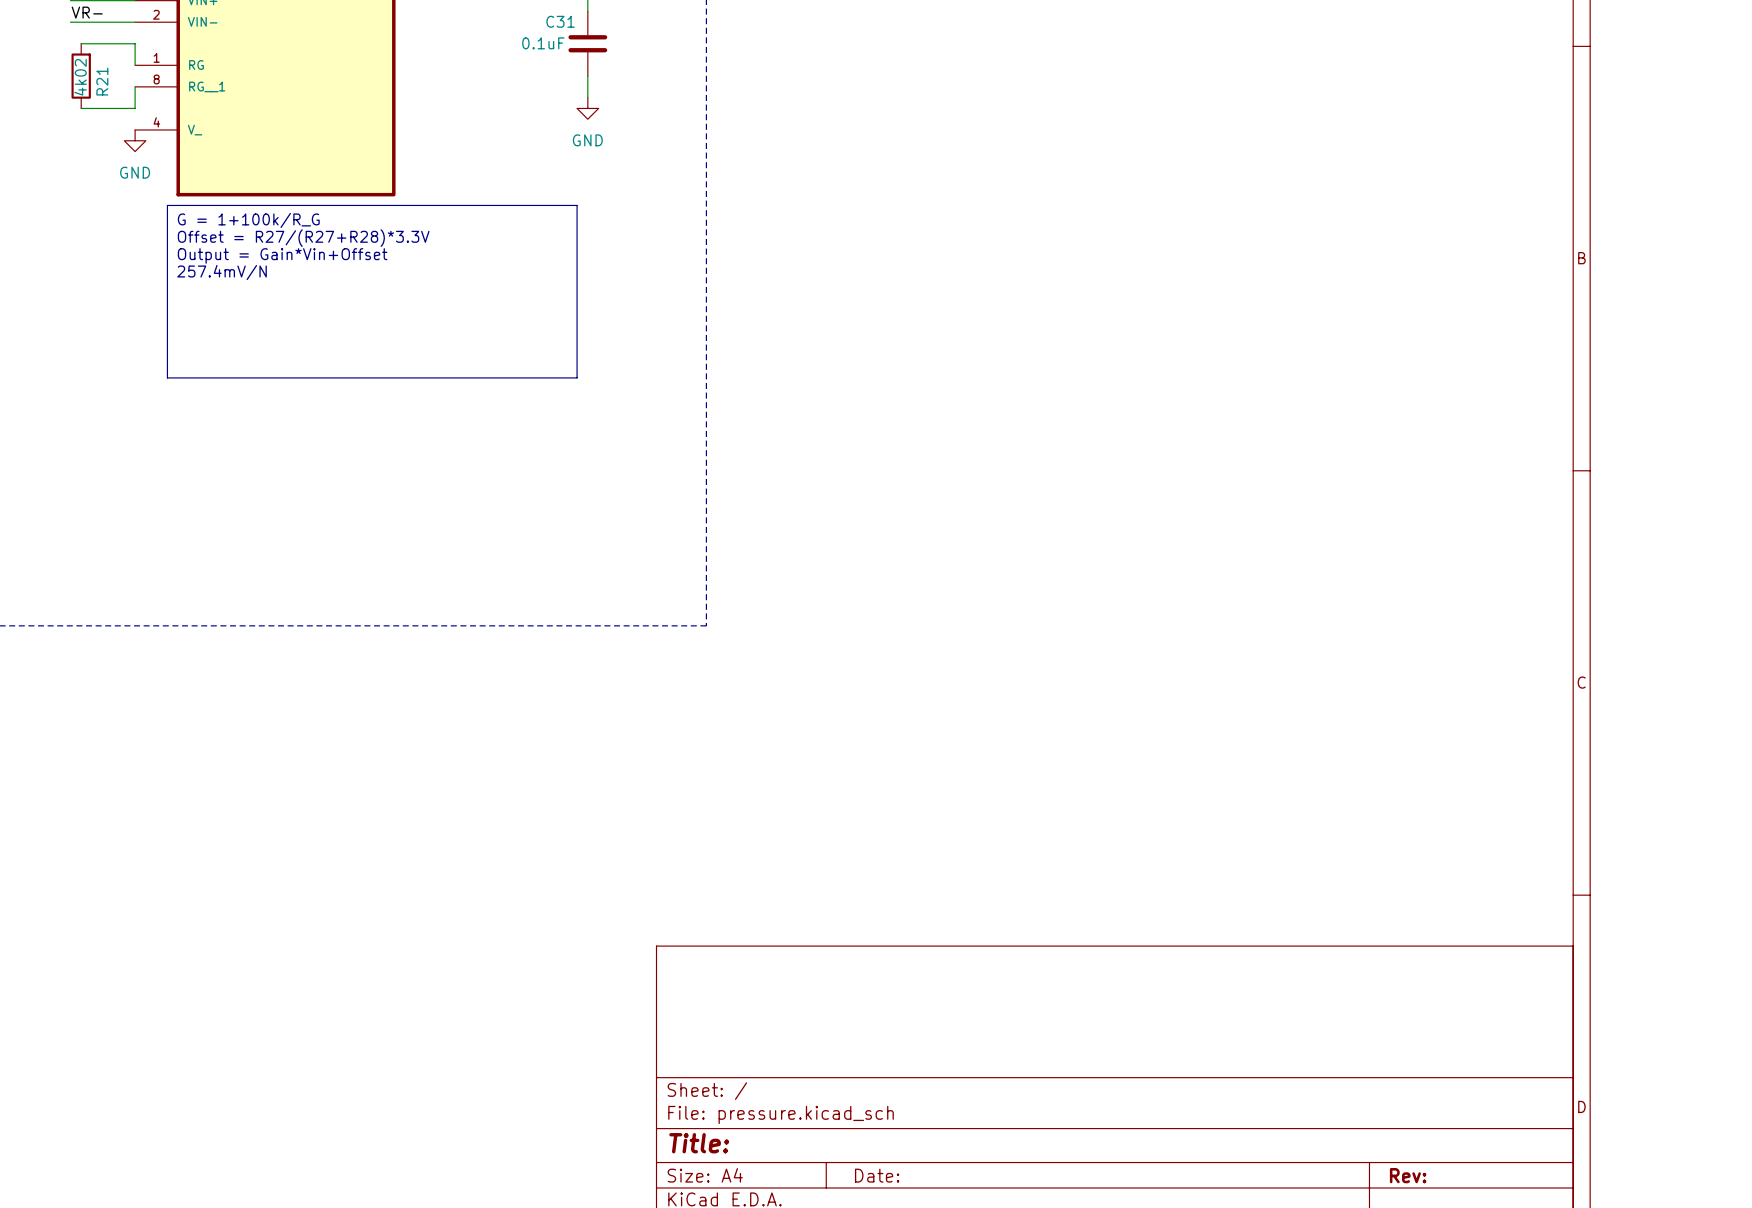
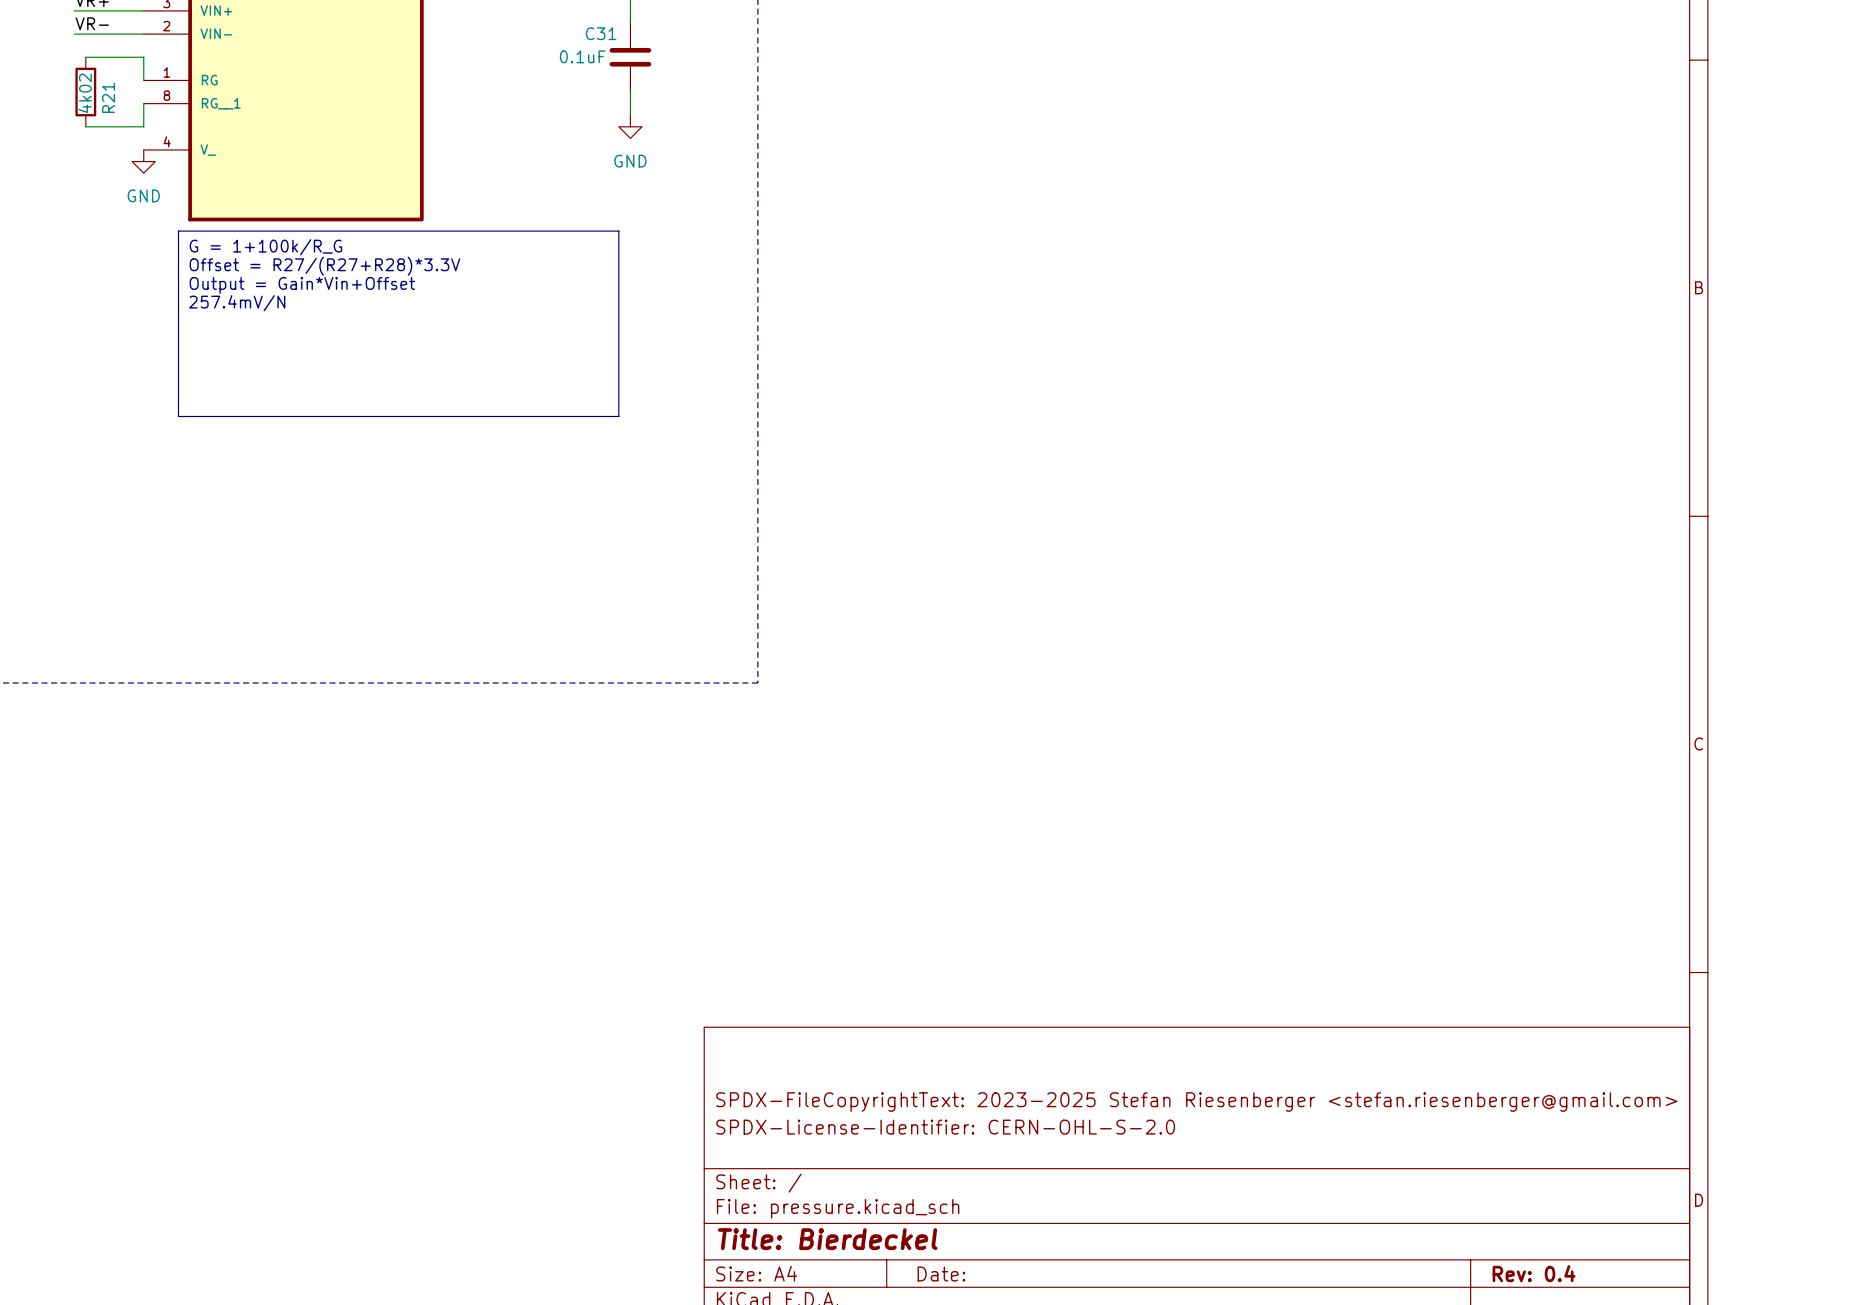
title block: none -> SPDX-FileCopyrightText: 2023-2025 Stefan Riesenberger <stefan.riesenberger@gmail.com> (1196, 1102)
title block: none -> SPDX-License-Identifier: CERN-OHL-S-2.0 (945, 1127)
title block: Title: (699, 1143) -> Title: Bierdeckel (827, 1239)
title block: Rev: (1408, 1175) -> Rev: 0.4 (1534, 1273)

